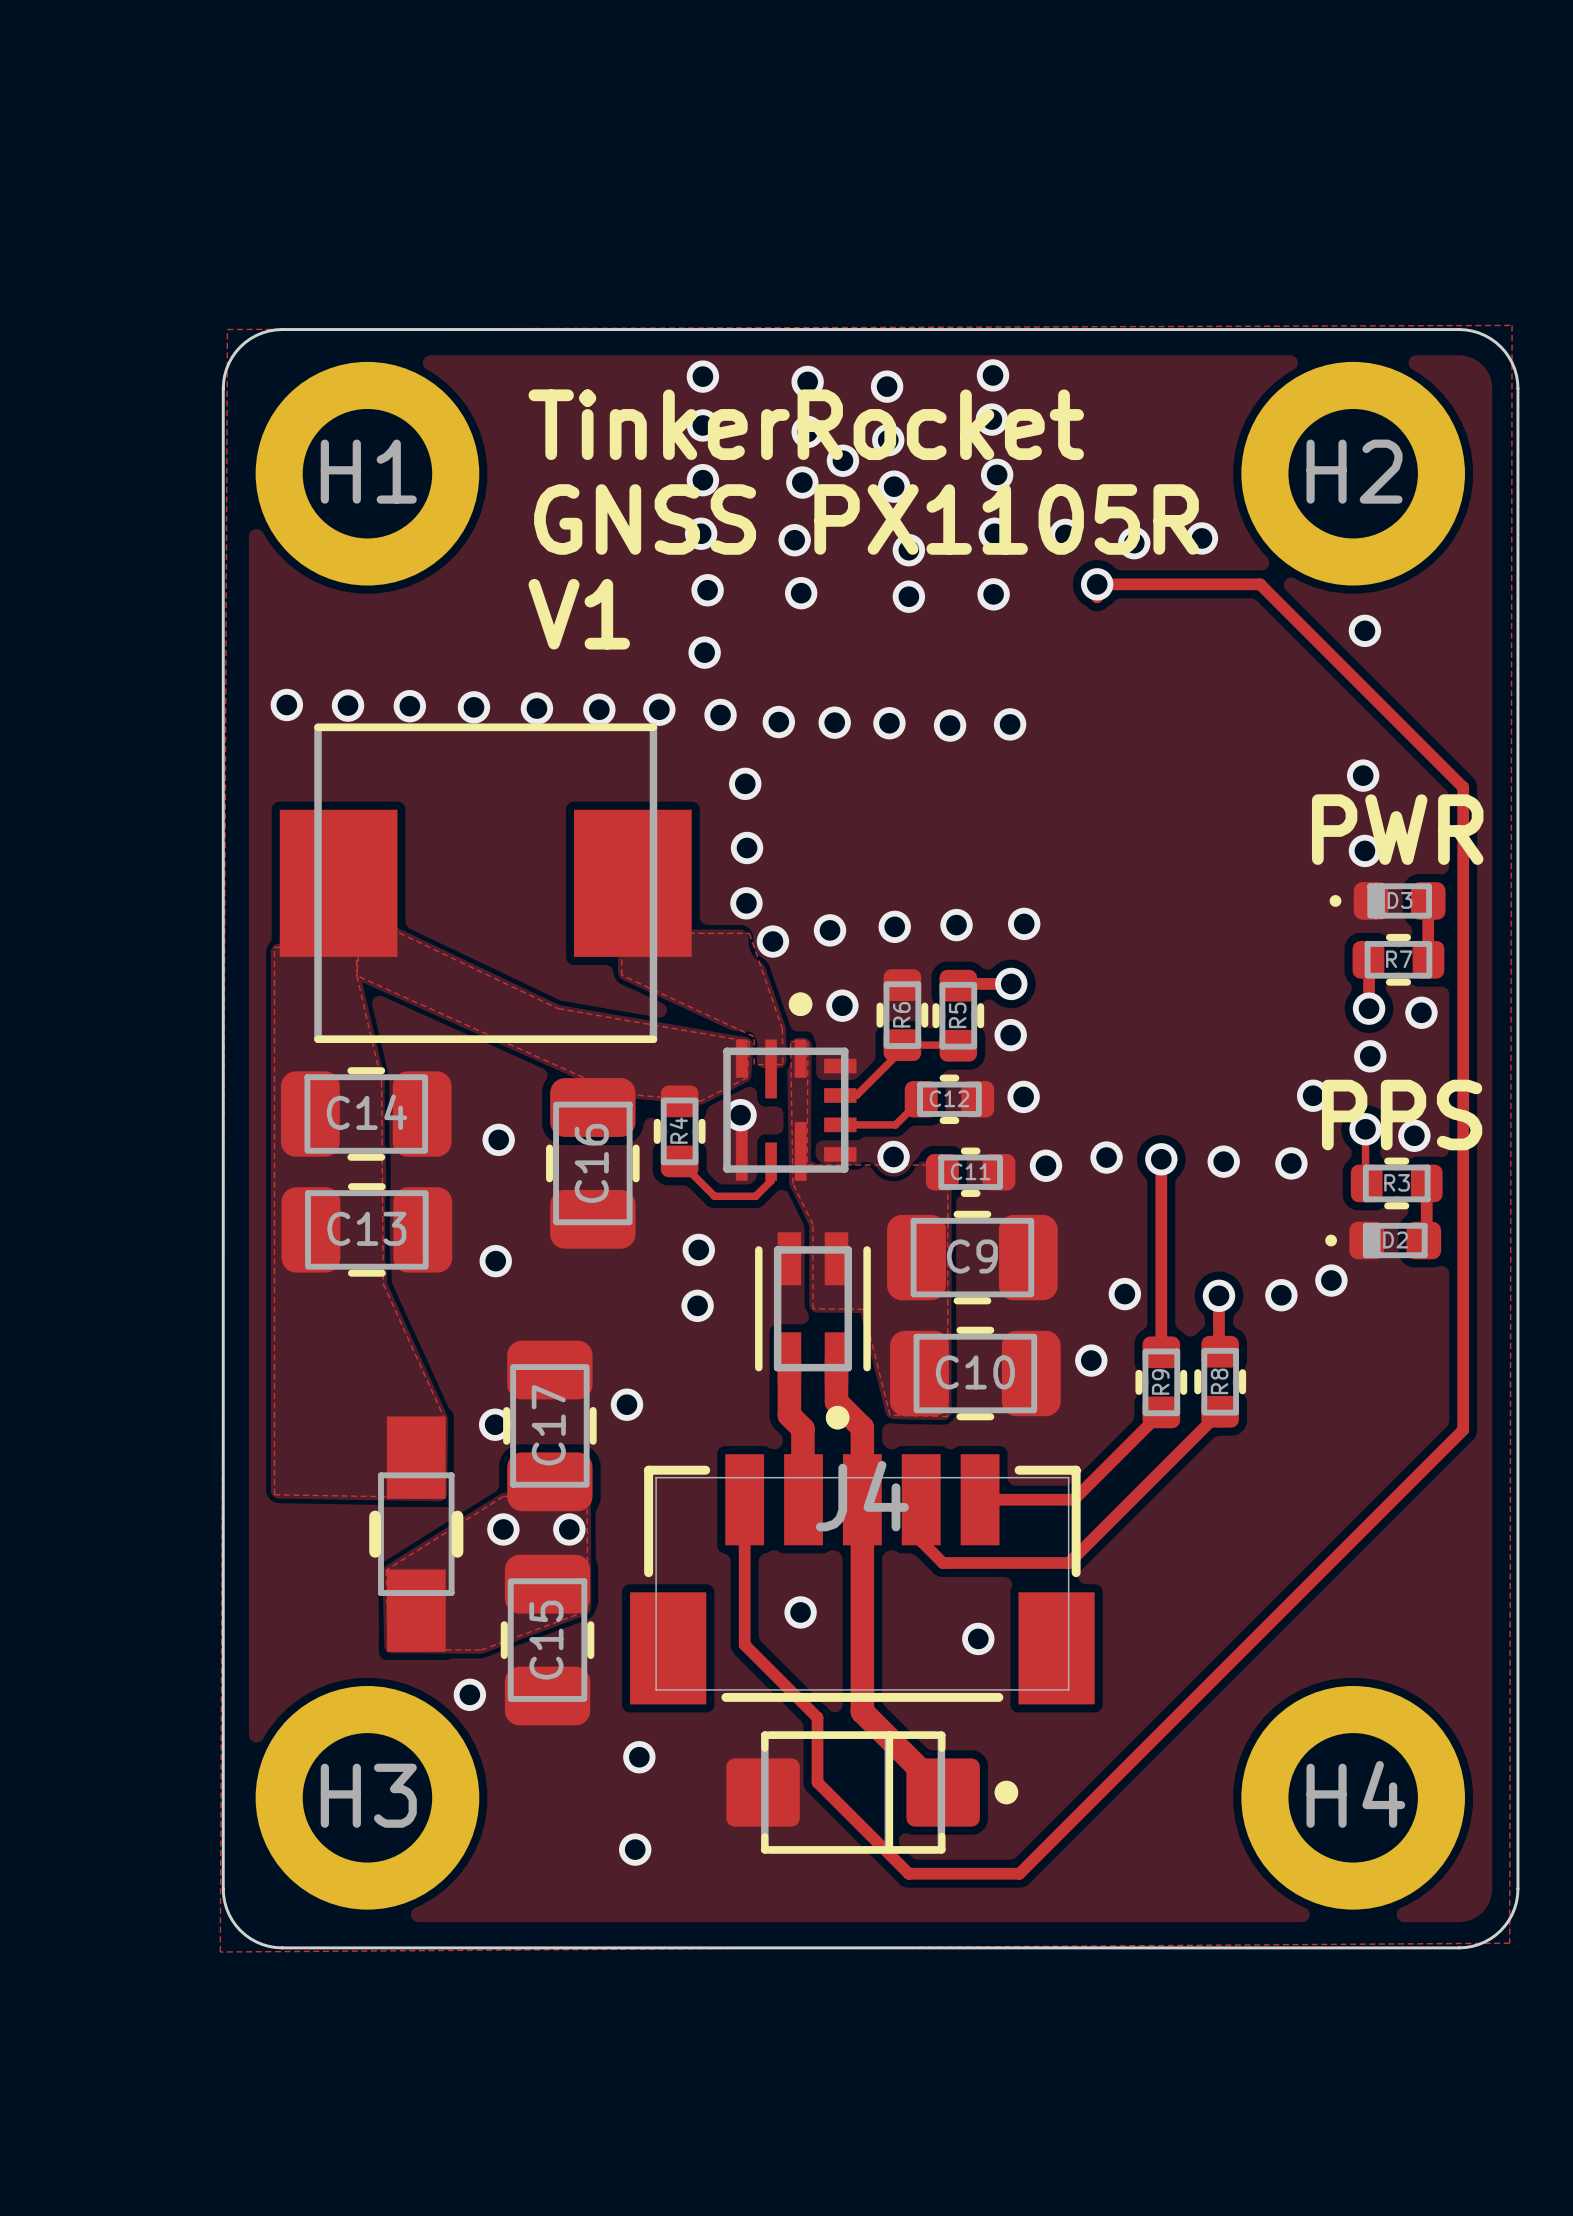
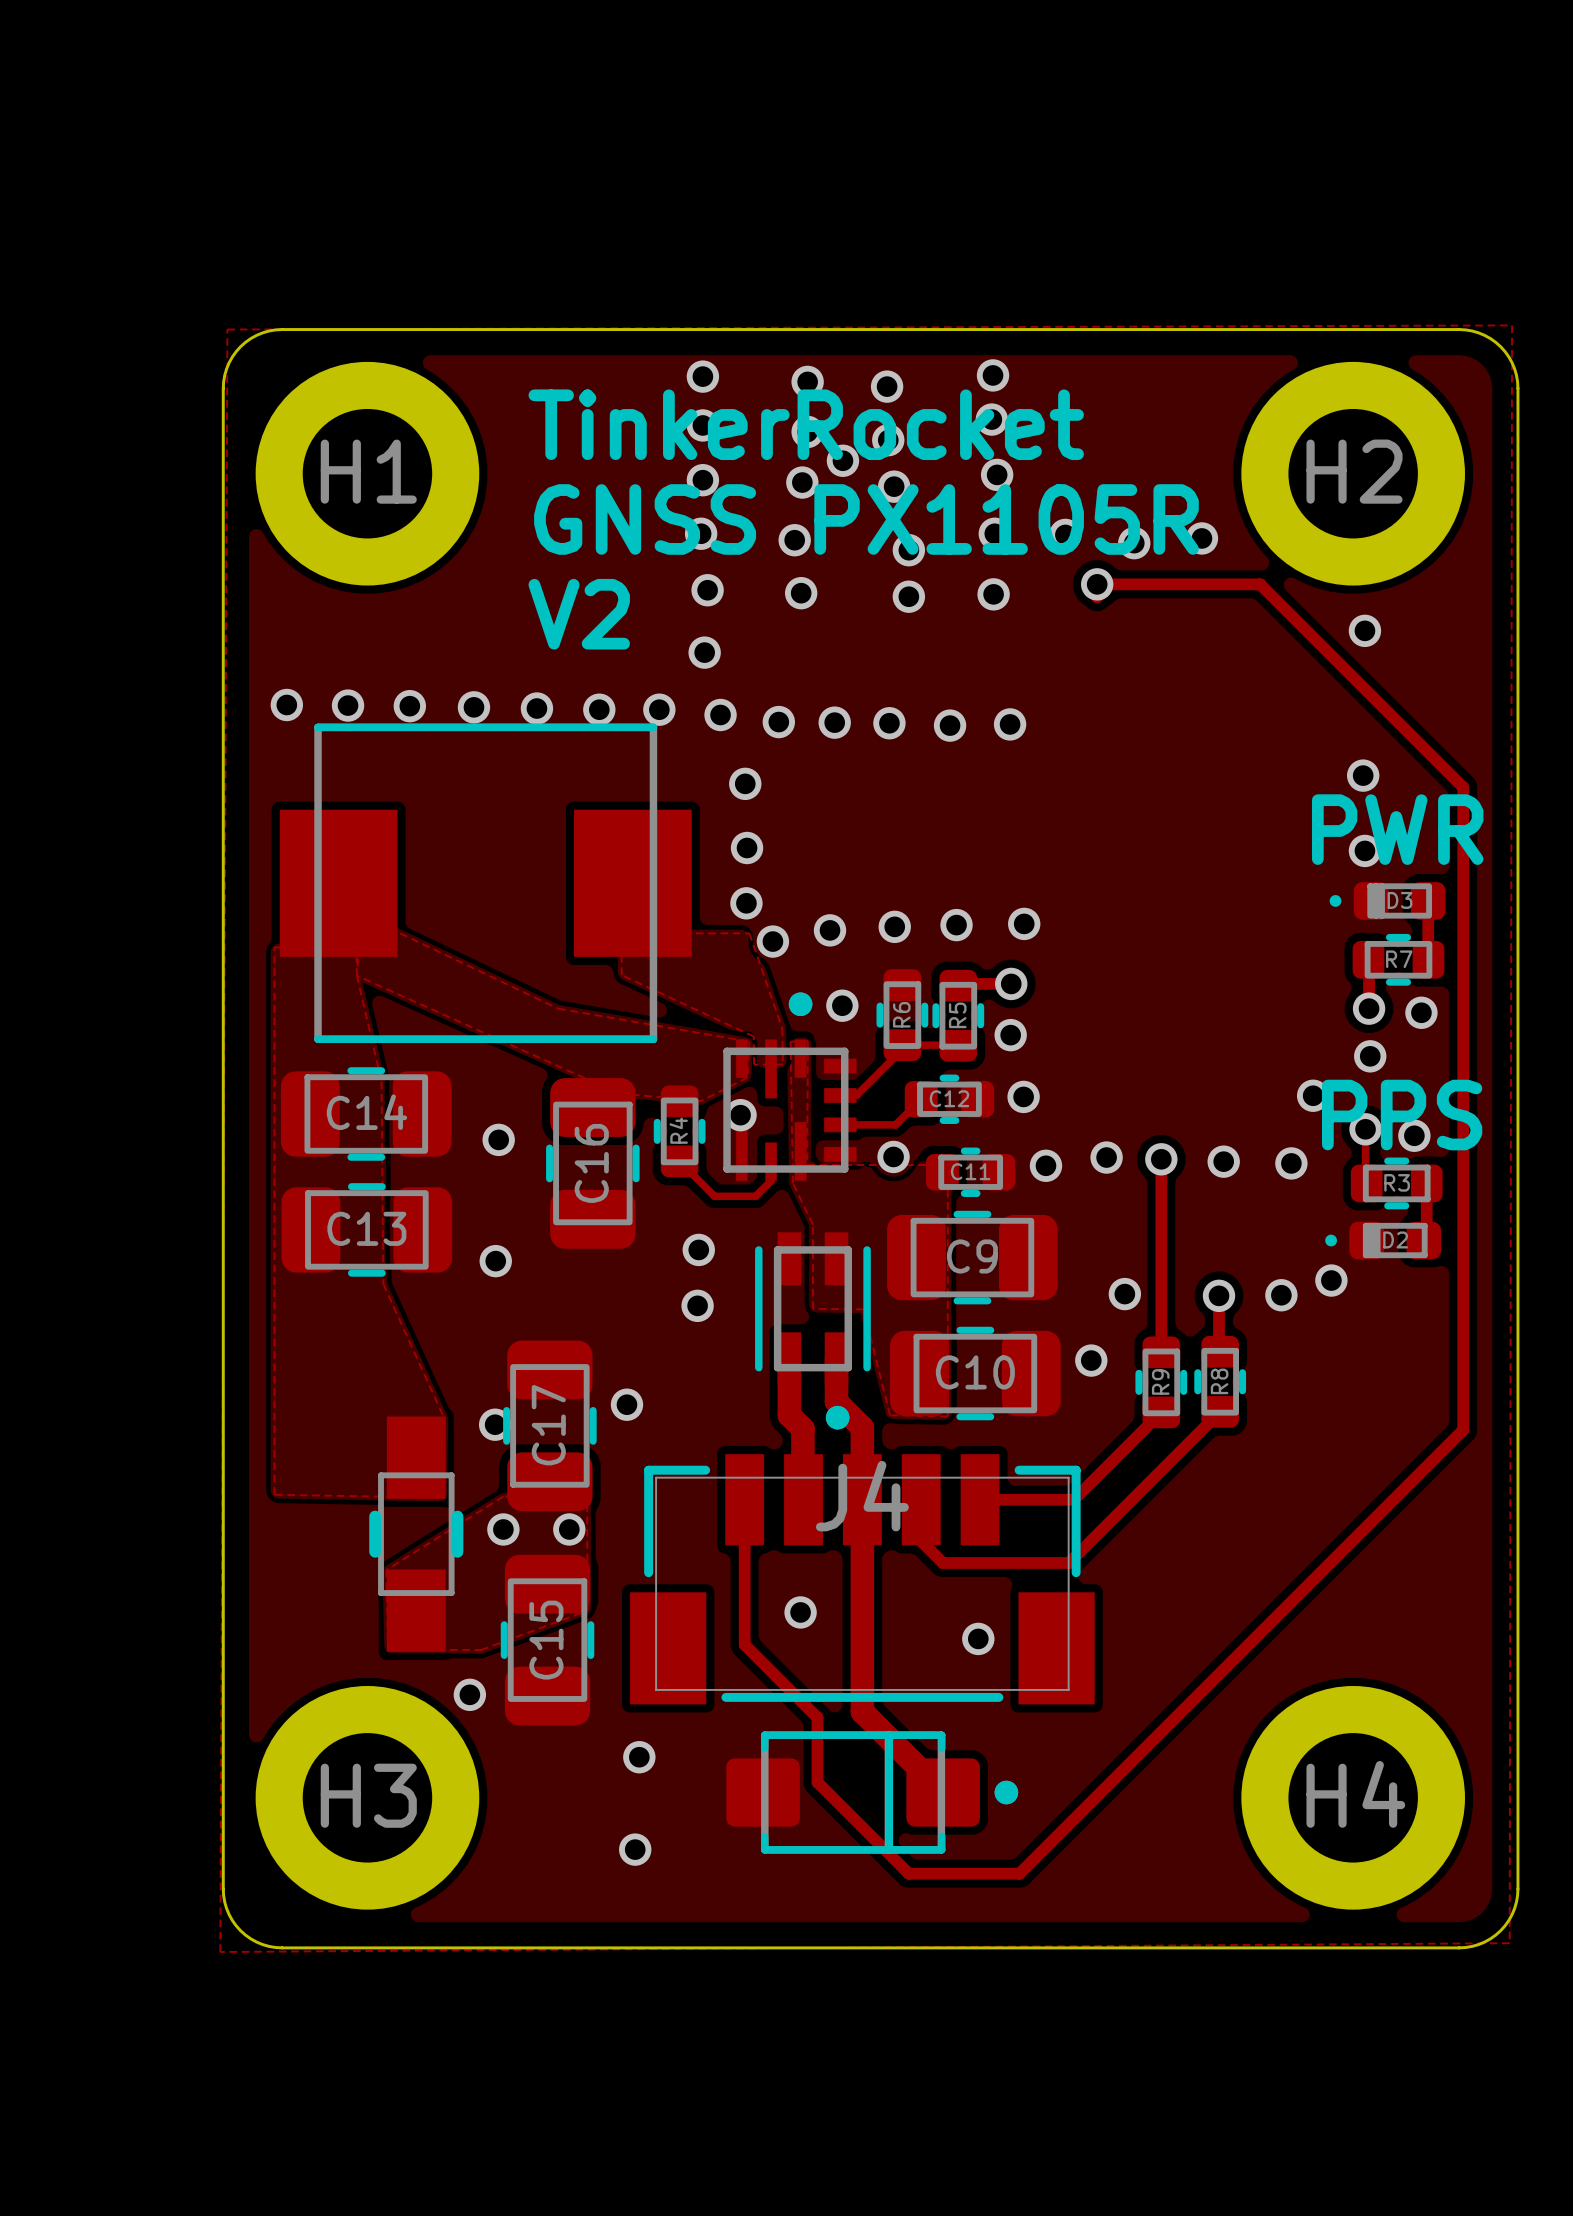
text: V1 (579, 614) -> V2 (579, 614)

